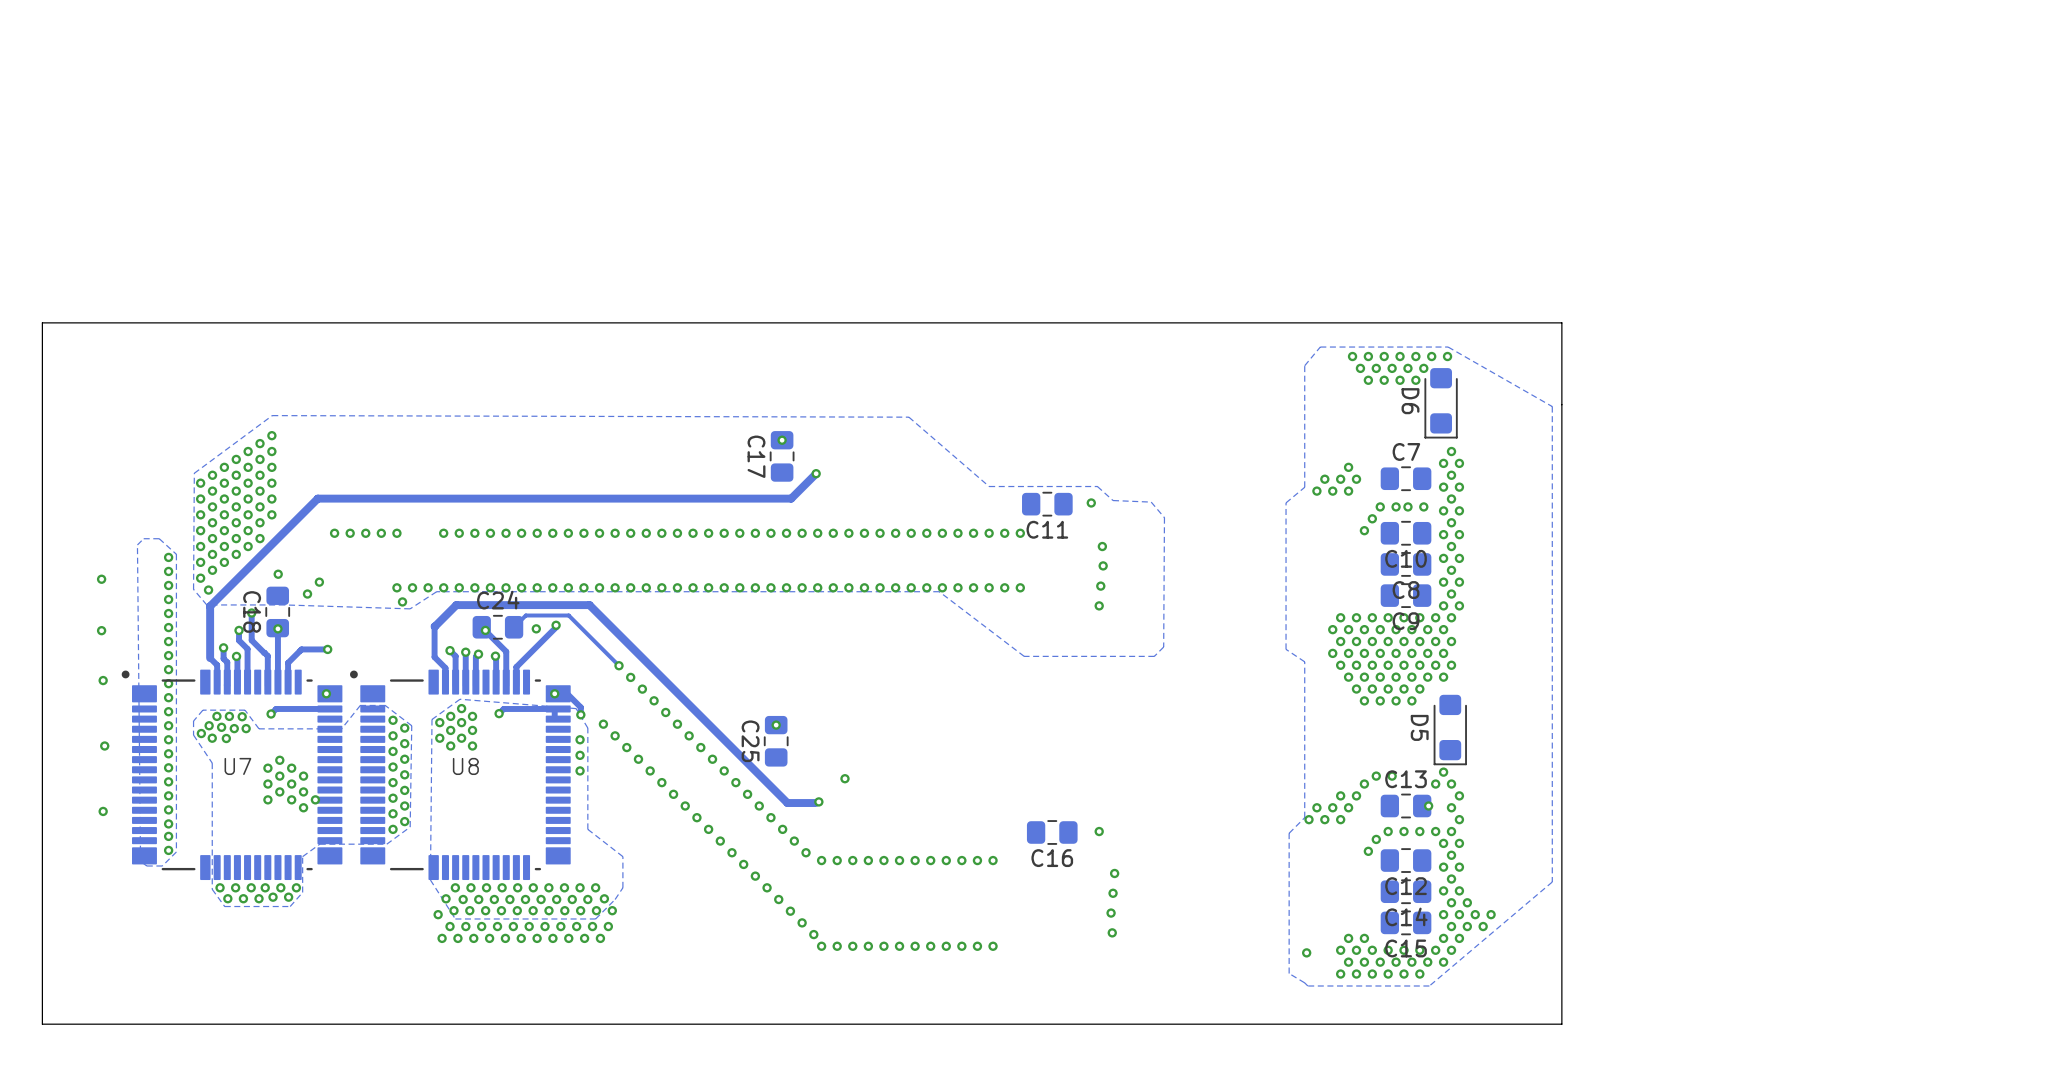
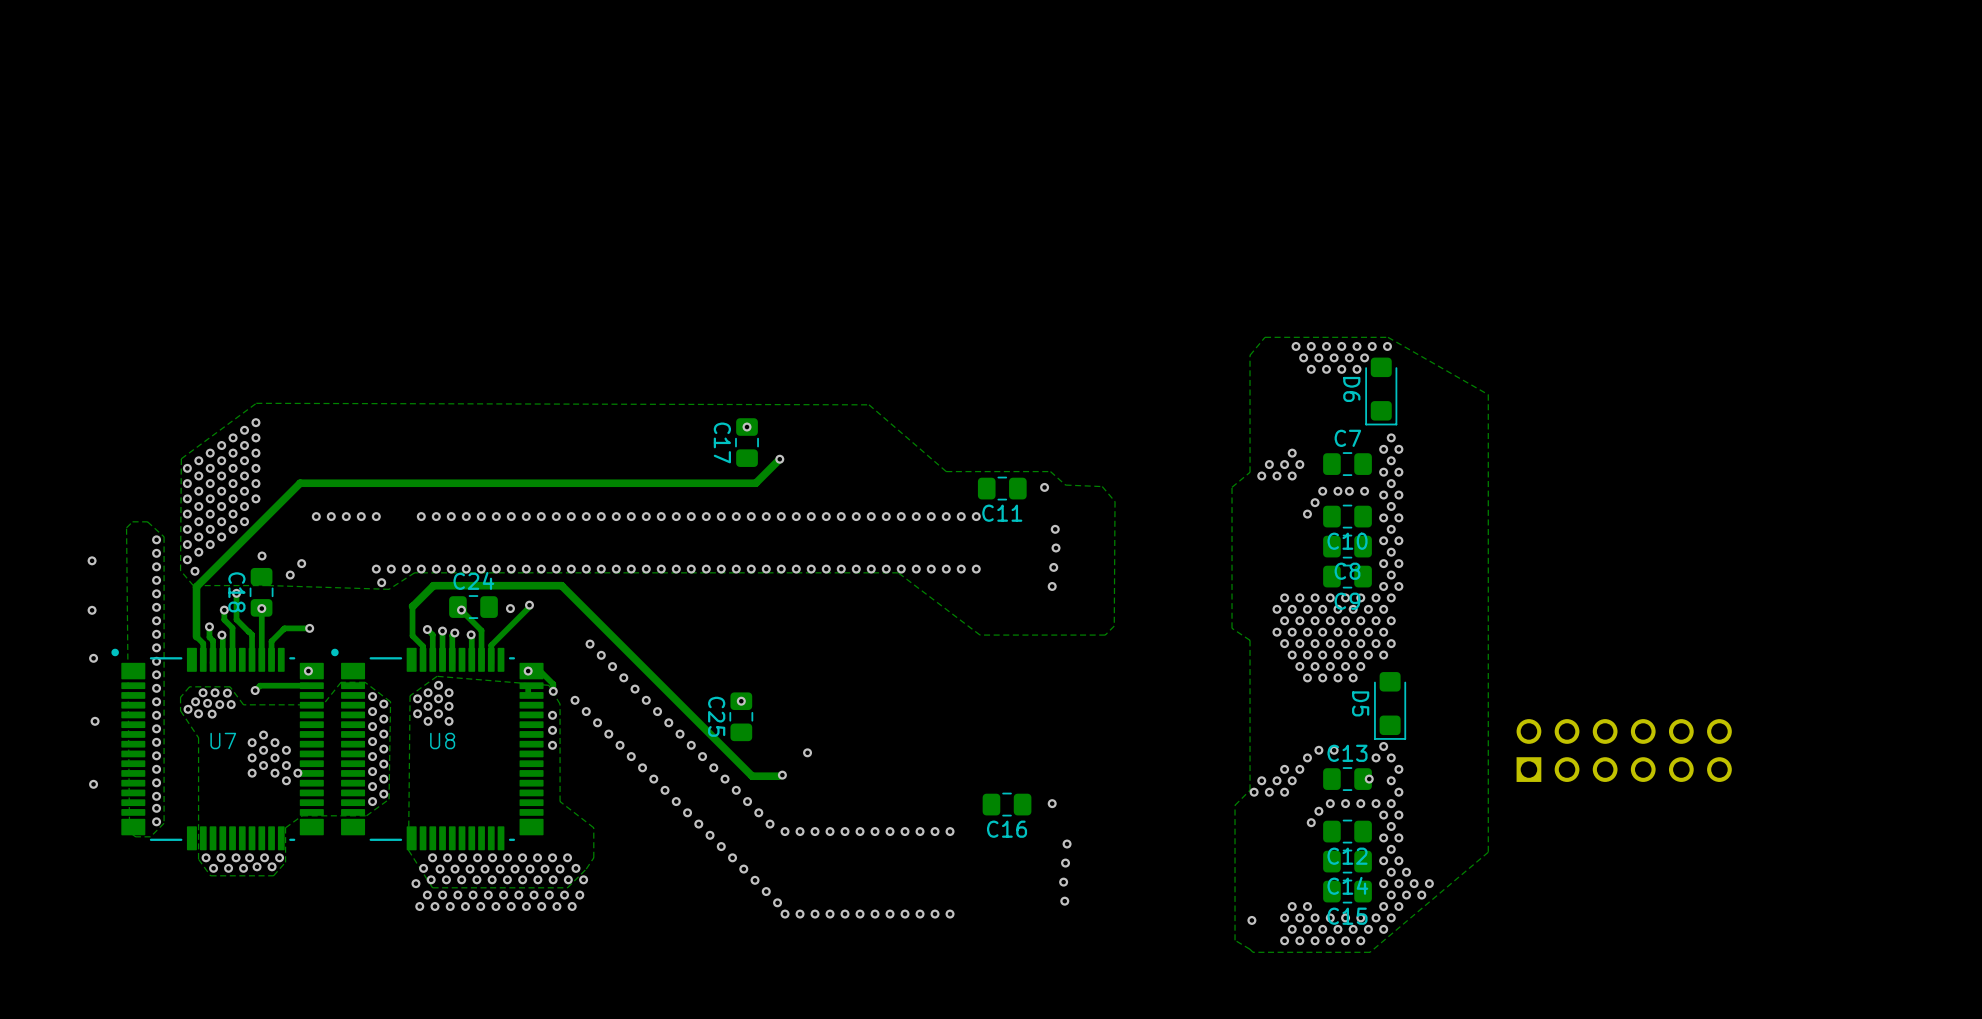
board edge: (1561, 322) (1561, 1024) (42, 1024) (42, 322) (1561, 322) -> none
track: (514, 627) (525, 615) (568, 615) (619, 665) -> none
track: (554, 708) (503, 708) (499, 713) -> none
via: (499, 713) -> none
part: none -> (1624, 750)

